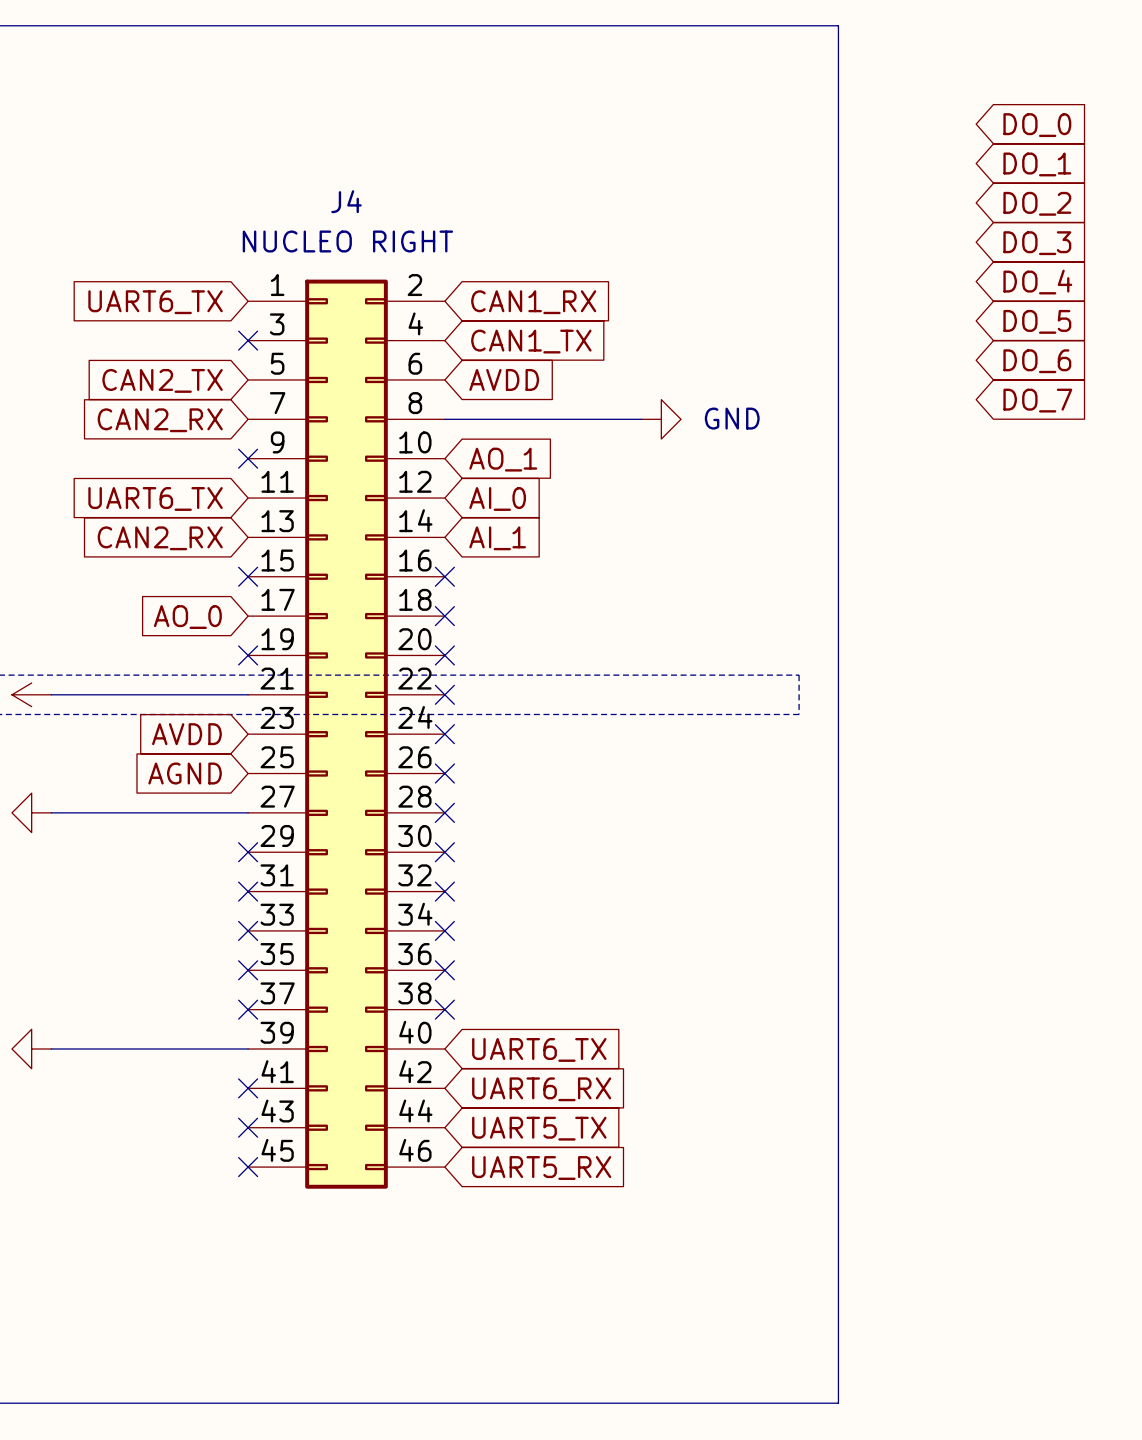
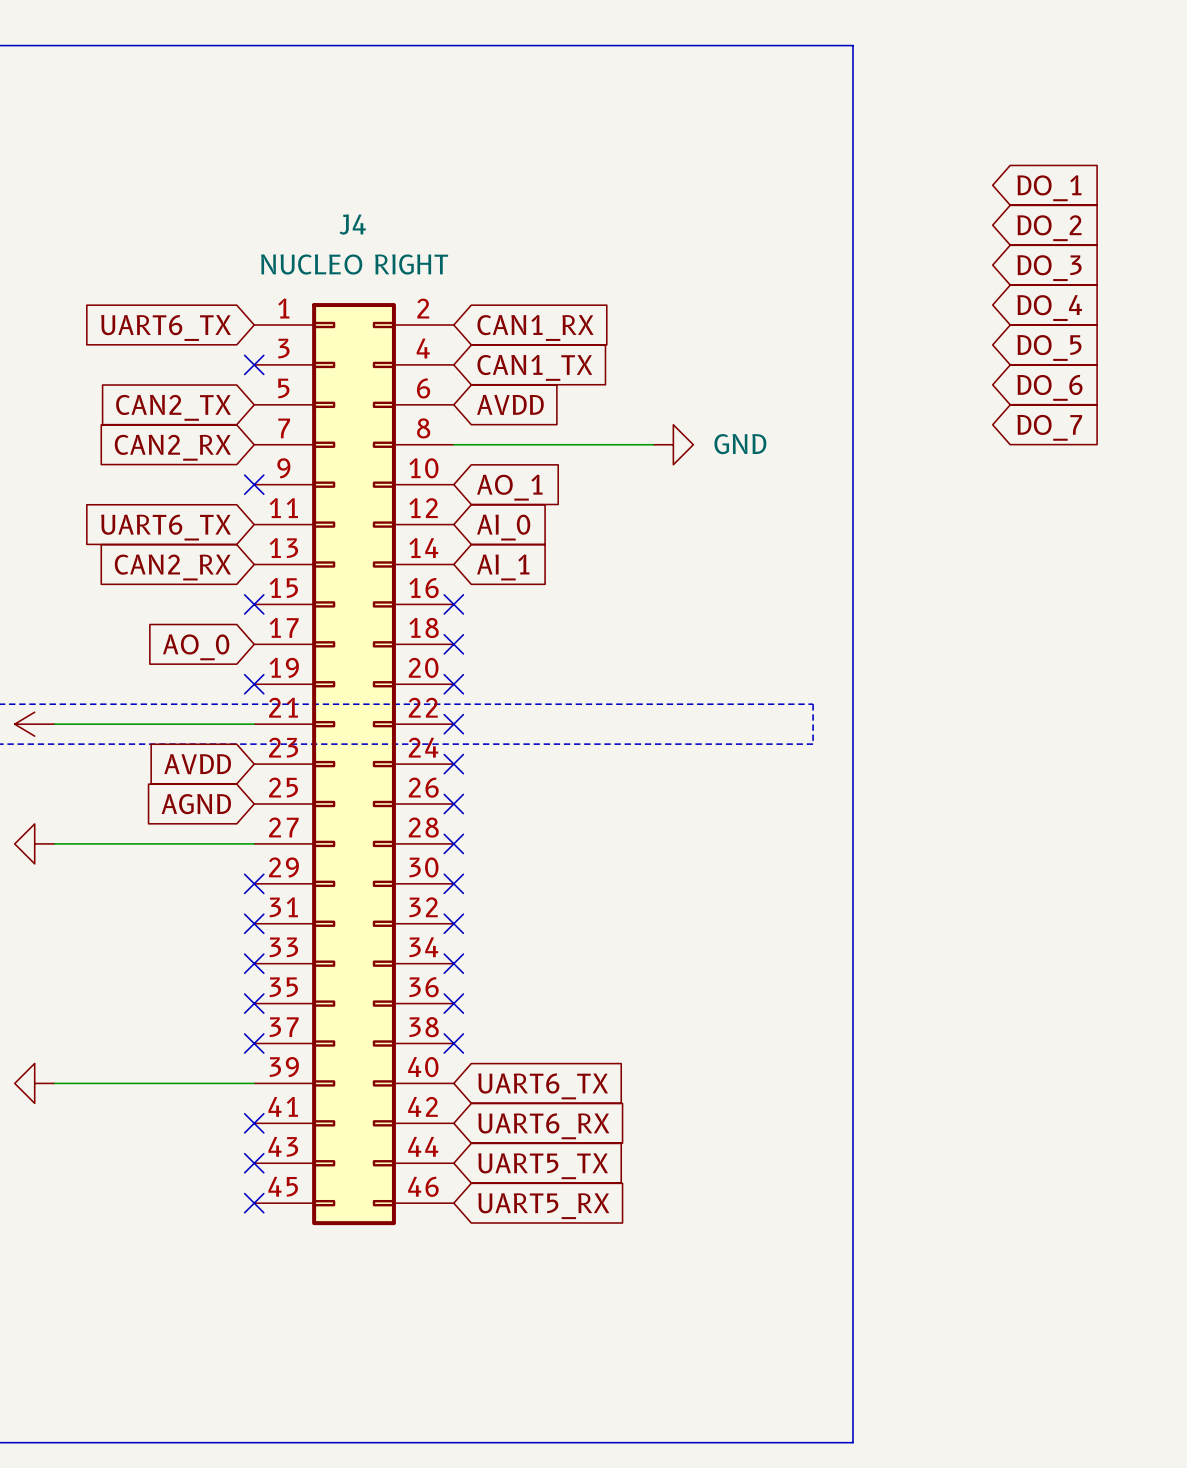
global label: DO_0 (1037, 125) -> none

